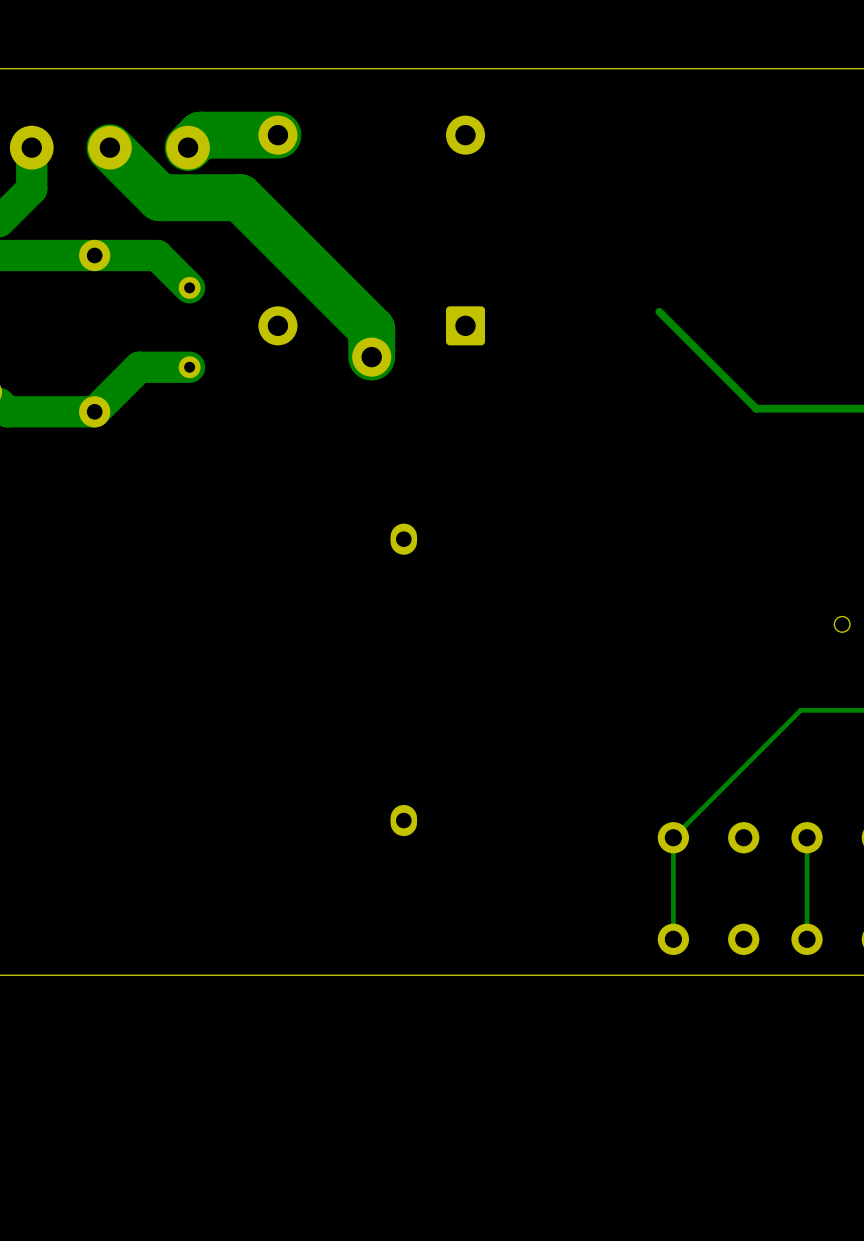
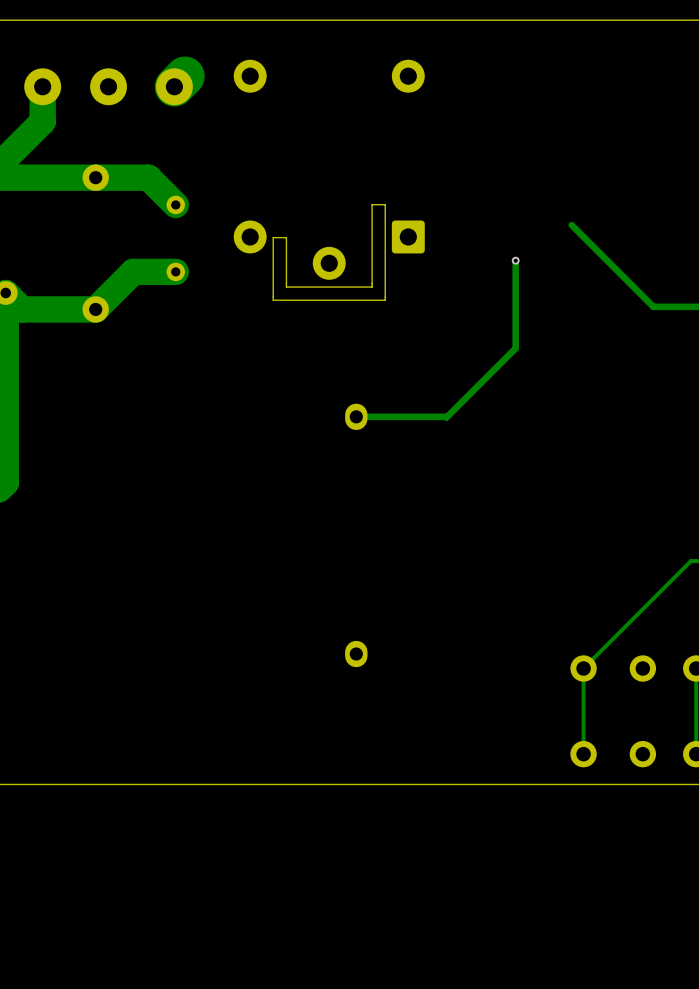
track: (277, 135) (200, 135) -> none
track: (109, 147) (159, 197) (239, 197) (371, 329) (371, 357) -> none
board edge: none -> (385, 204) (372, 204) (372, 287) (286, 287) (286, 237) (273, 237) (273, 300) (385, 300) (385, 204)
track: none -> (515, 260) (515, 348) (446, 417) (356, 416)
via: none -> (515, 260)

